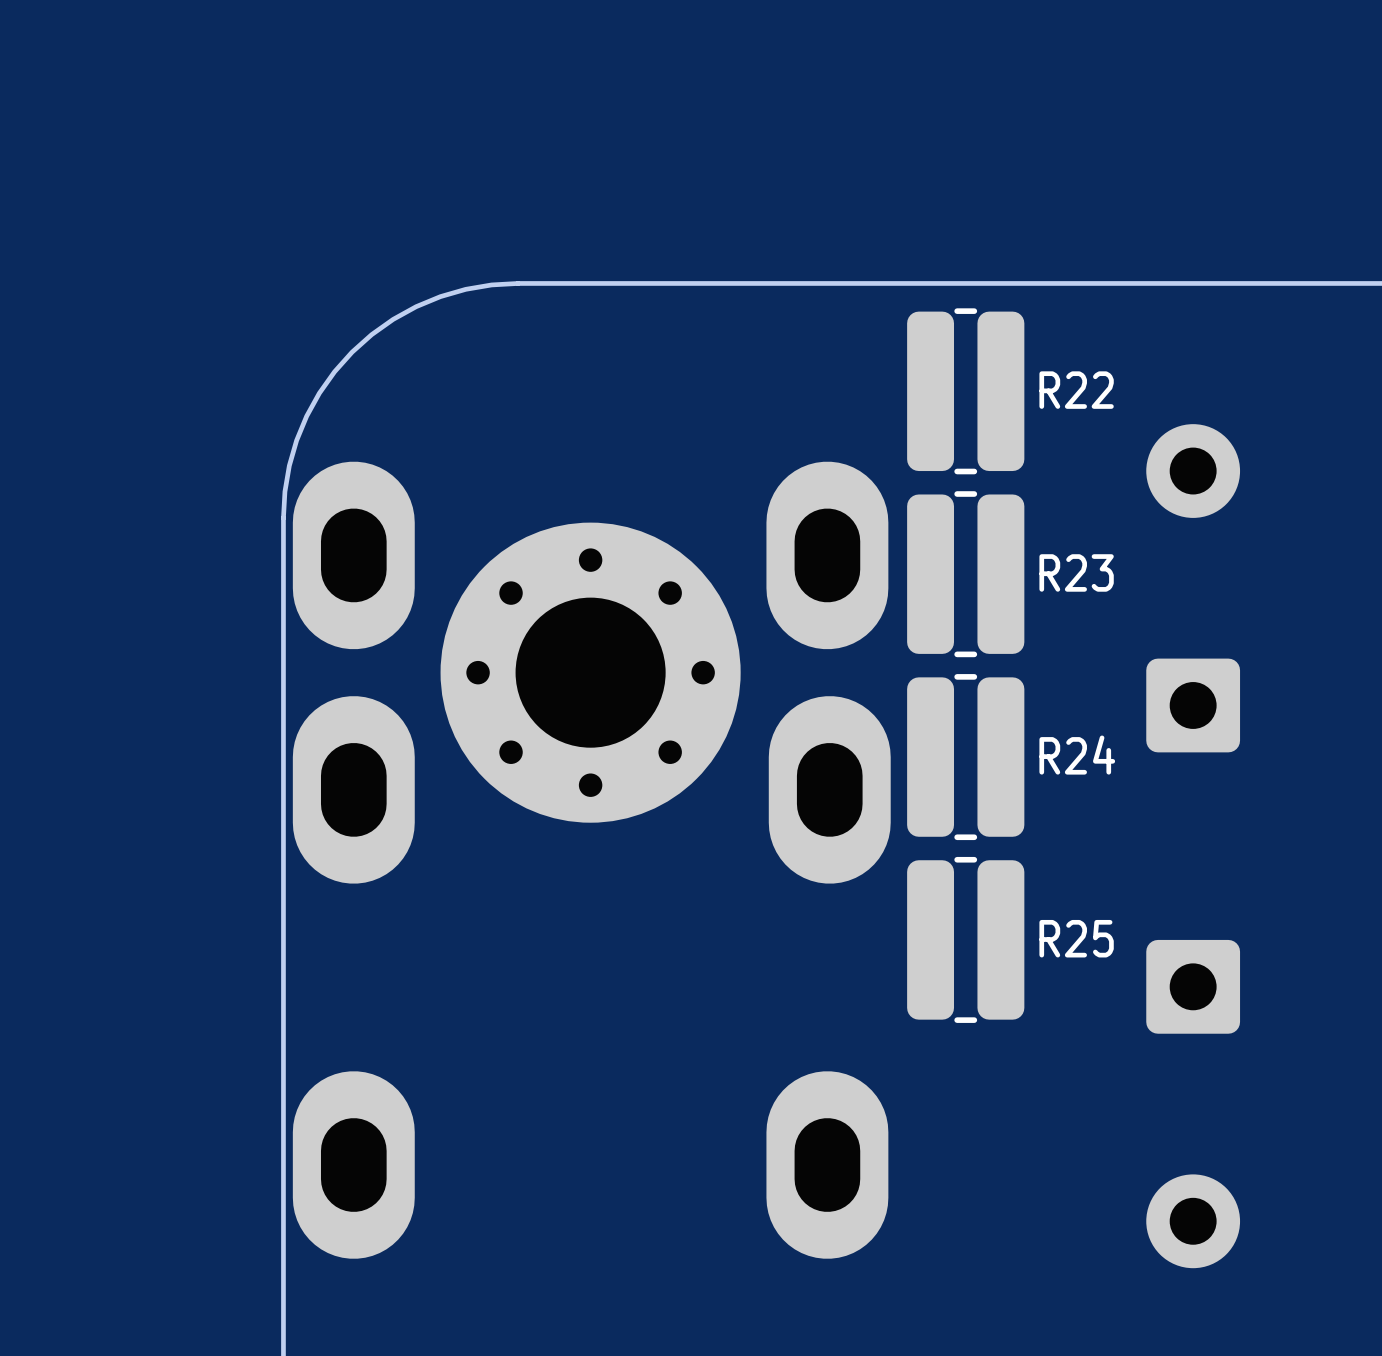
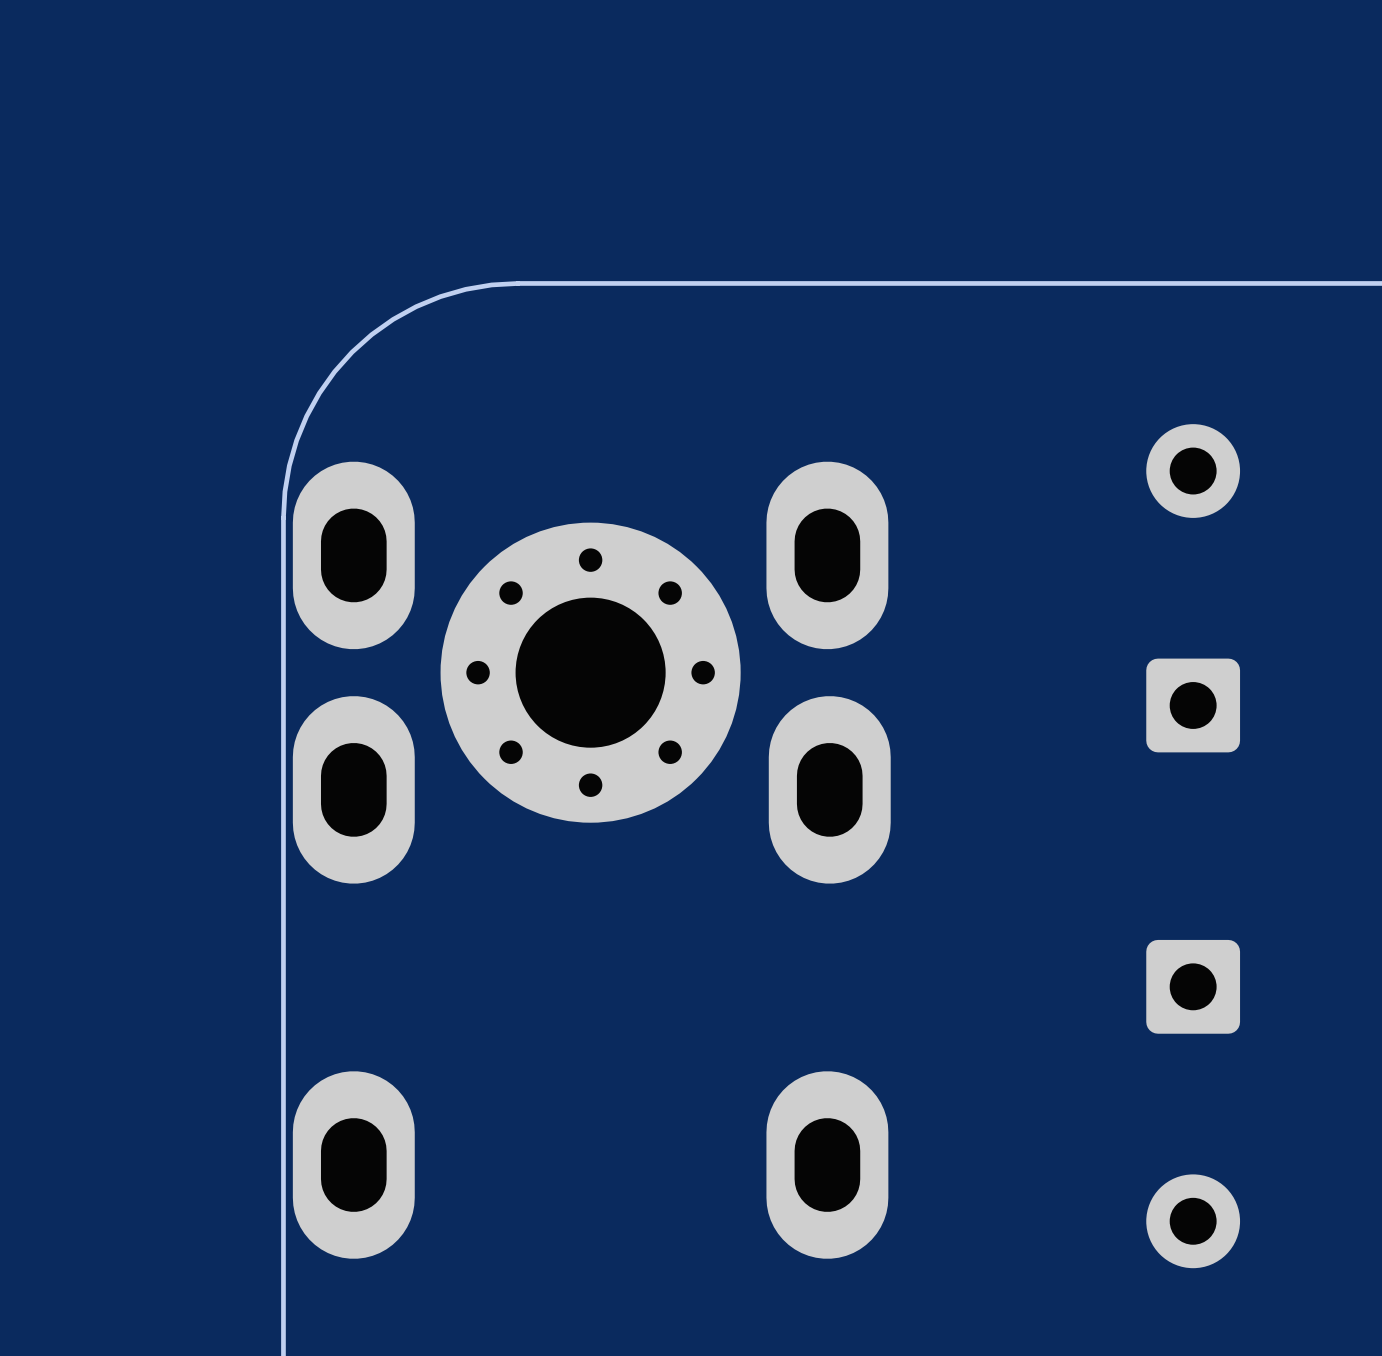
R22: (965, 391) -> none
R23: (965, 574) -> none
R24: (965, 757) -> none
R25: (965, 939) -> none

